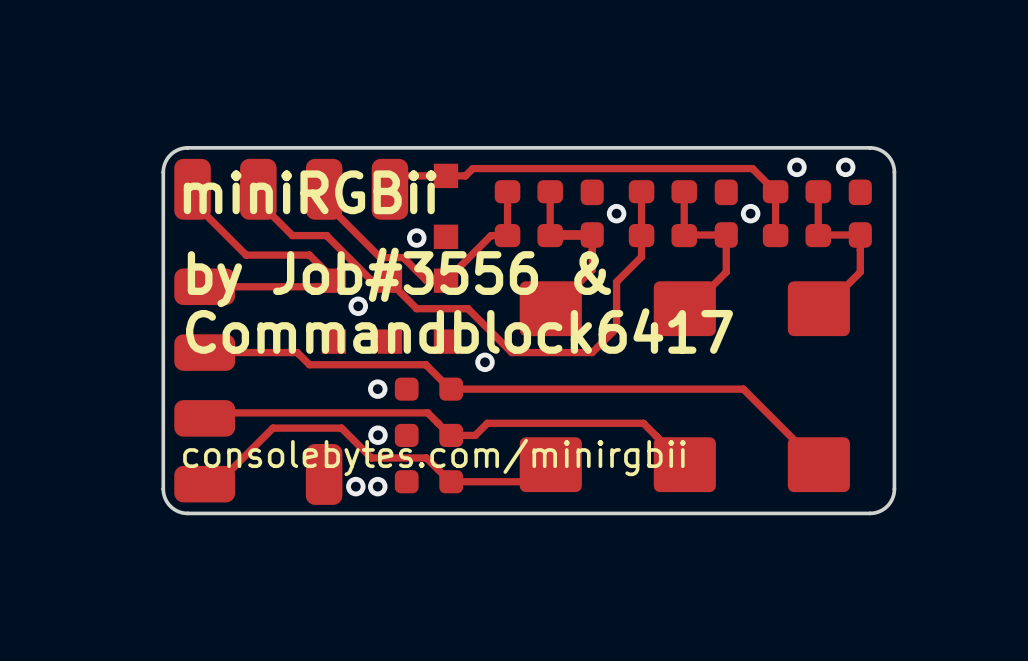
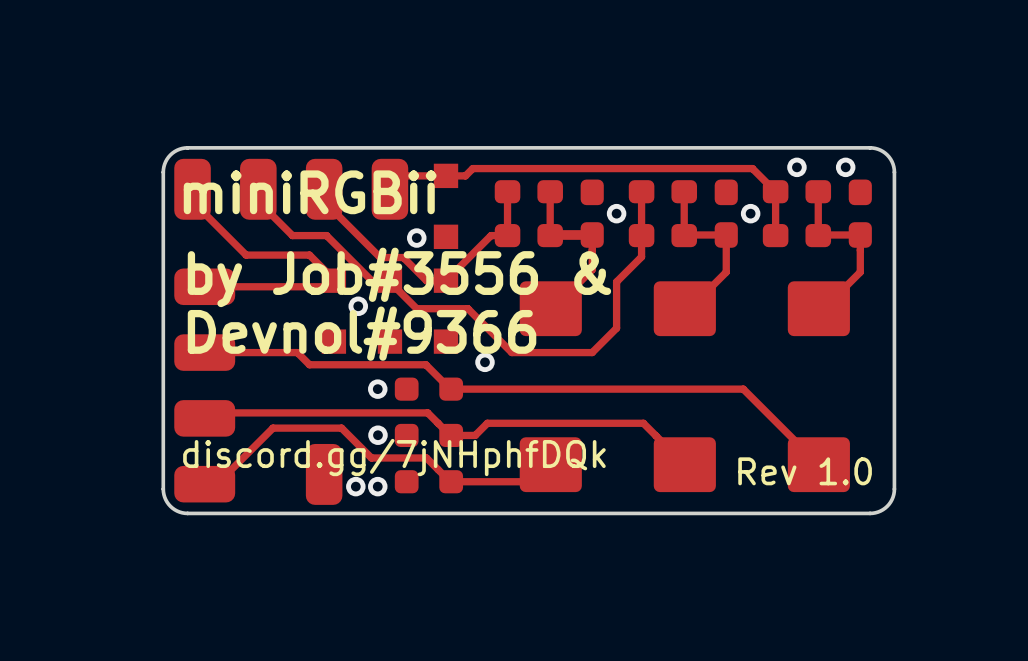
text: Commandblock6417 (459, 331) -> Devnol#9366 (362, 333)
text: consolebytes.com/minirgbii (434, 457) -> discord.gg/7jNHphfDQk (394, 457)
text: none -> Rev 1.0 (805, 471)

